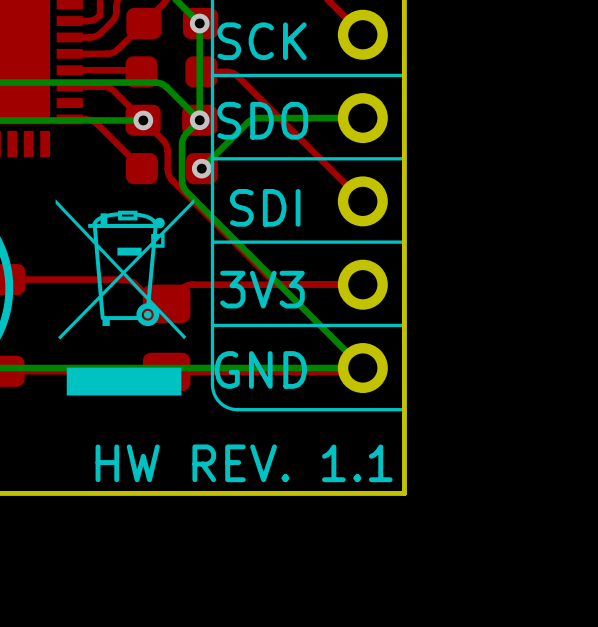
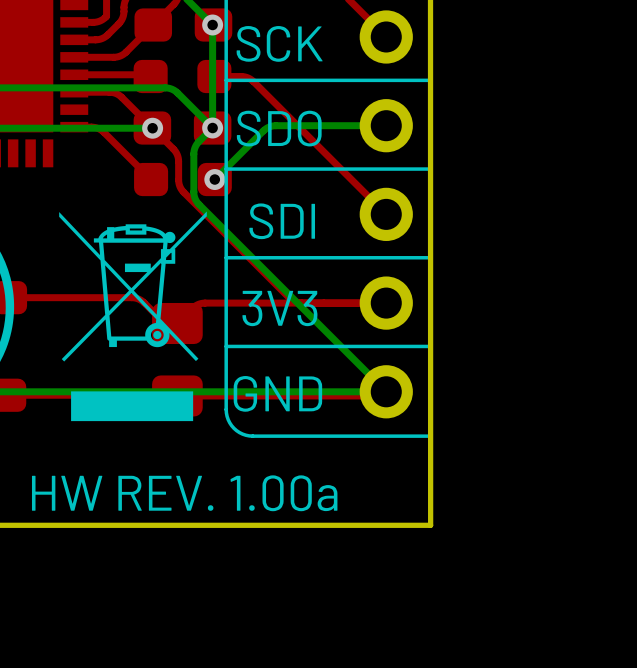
text: HW REV. 1.1 (244, 463) -> HW REV. 1.00a (184, 493)

